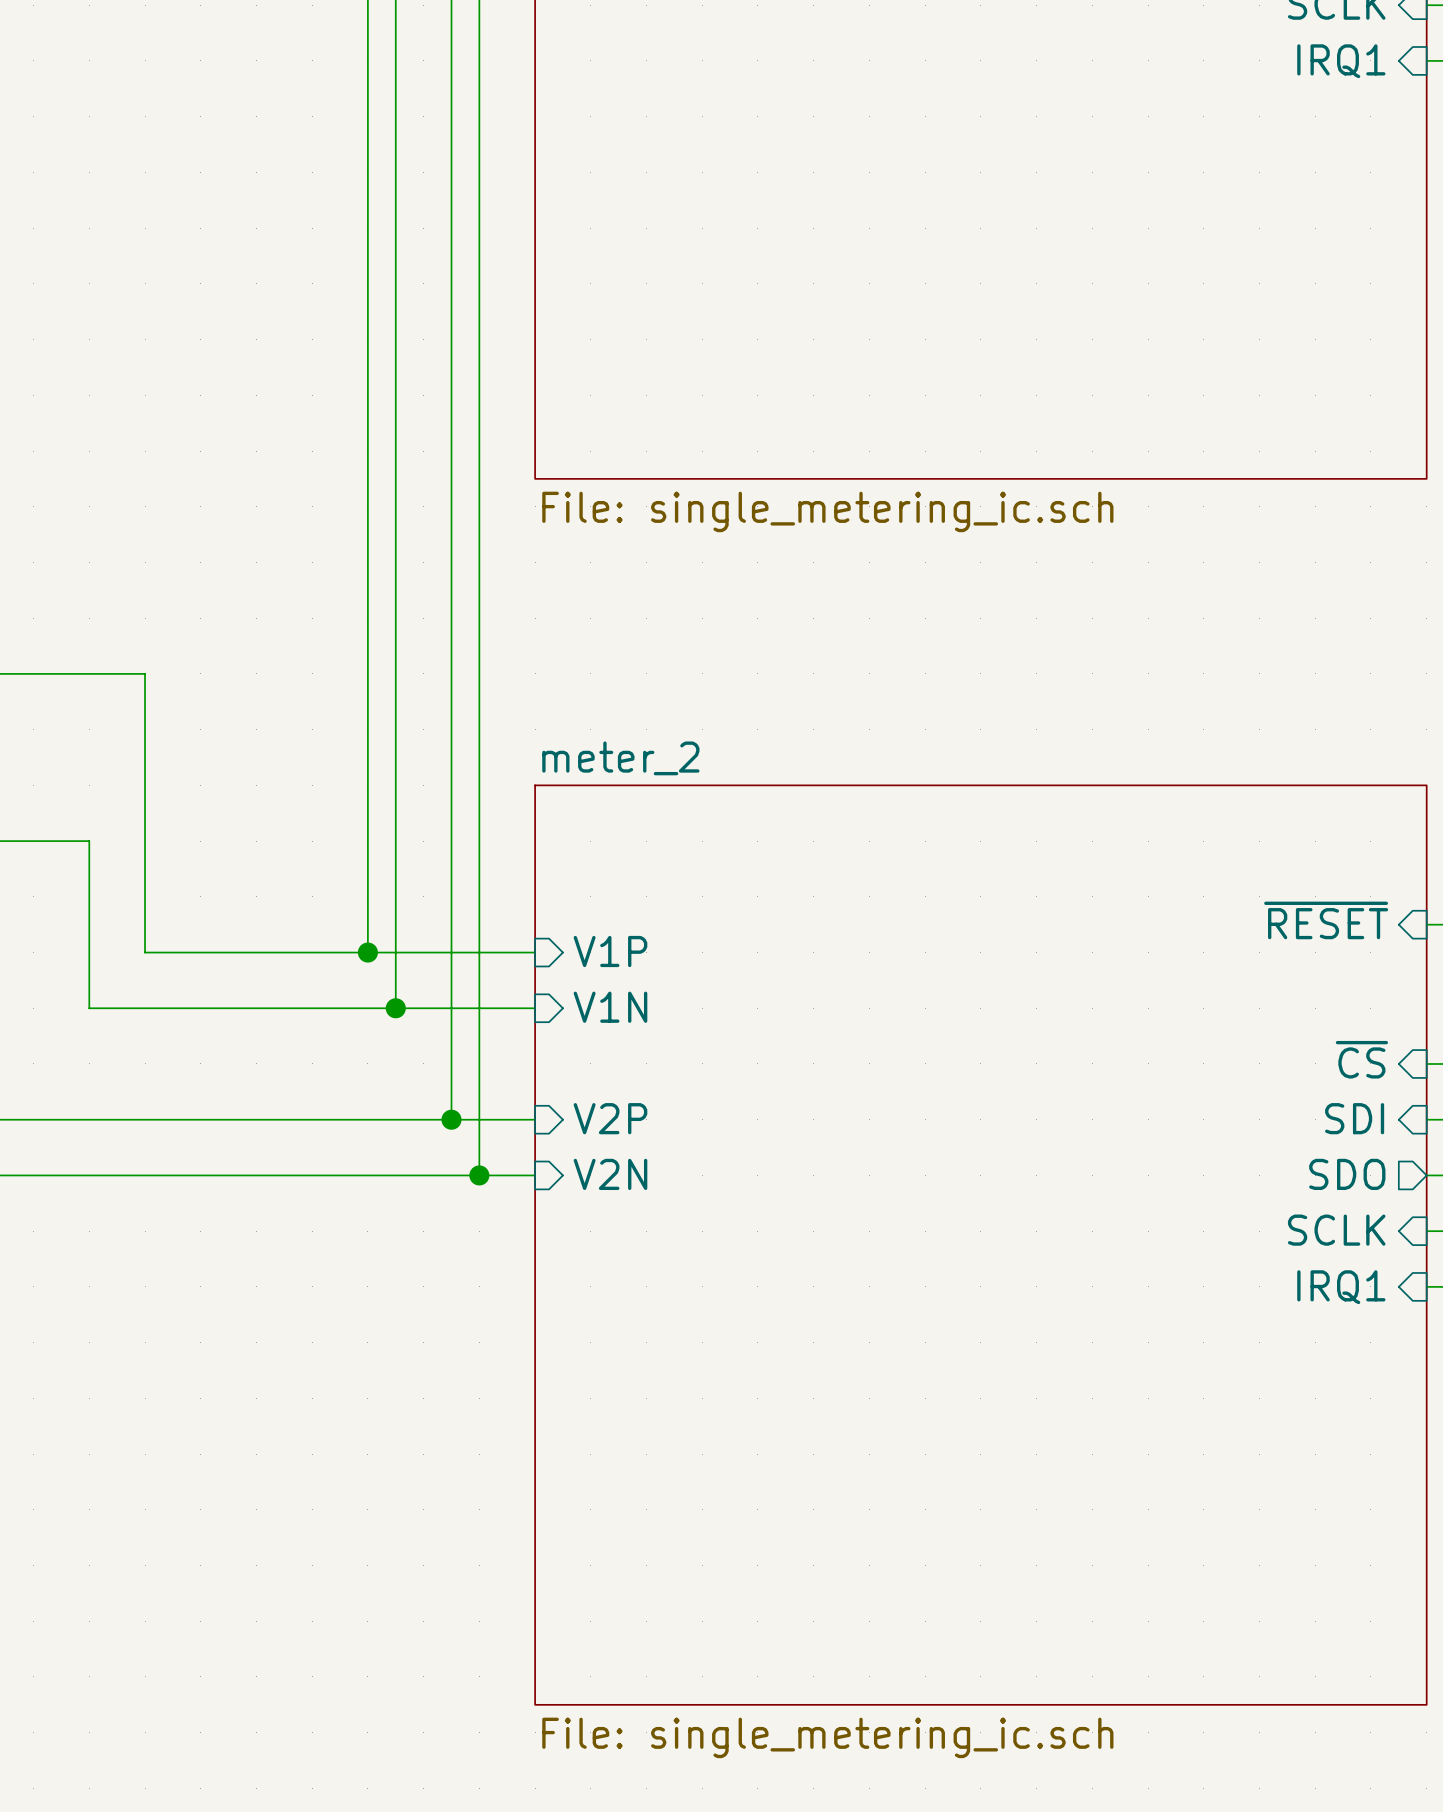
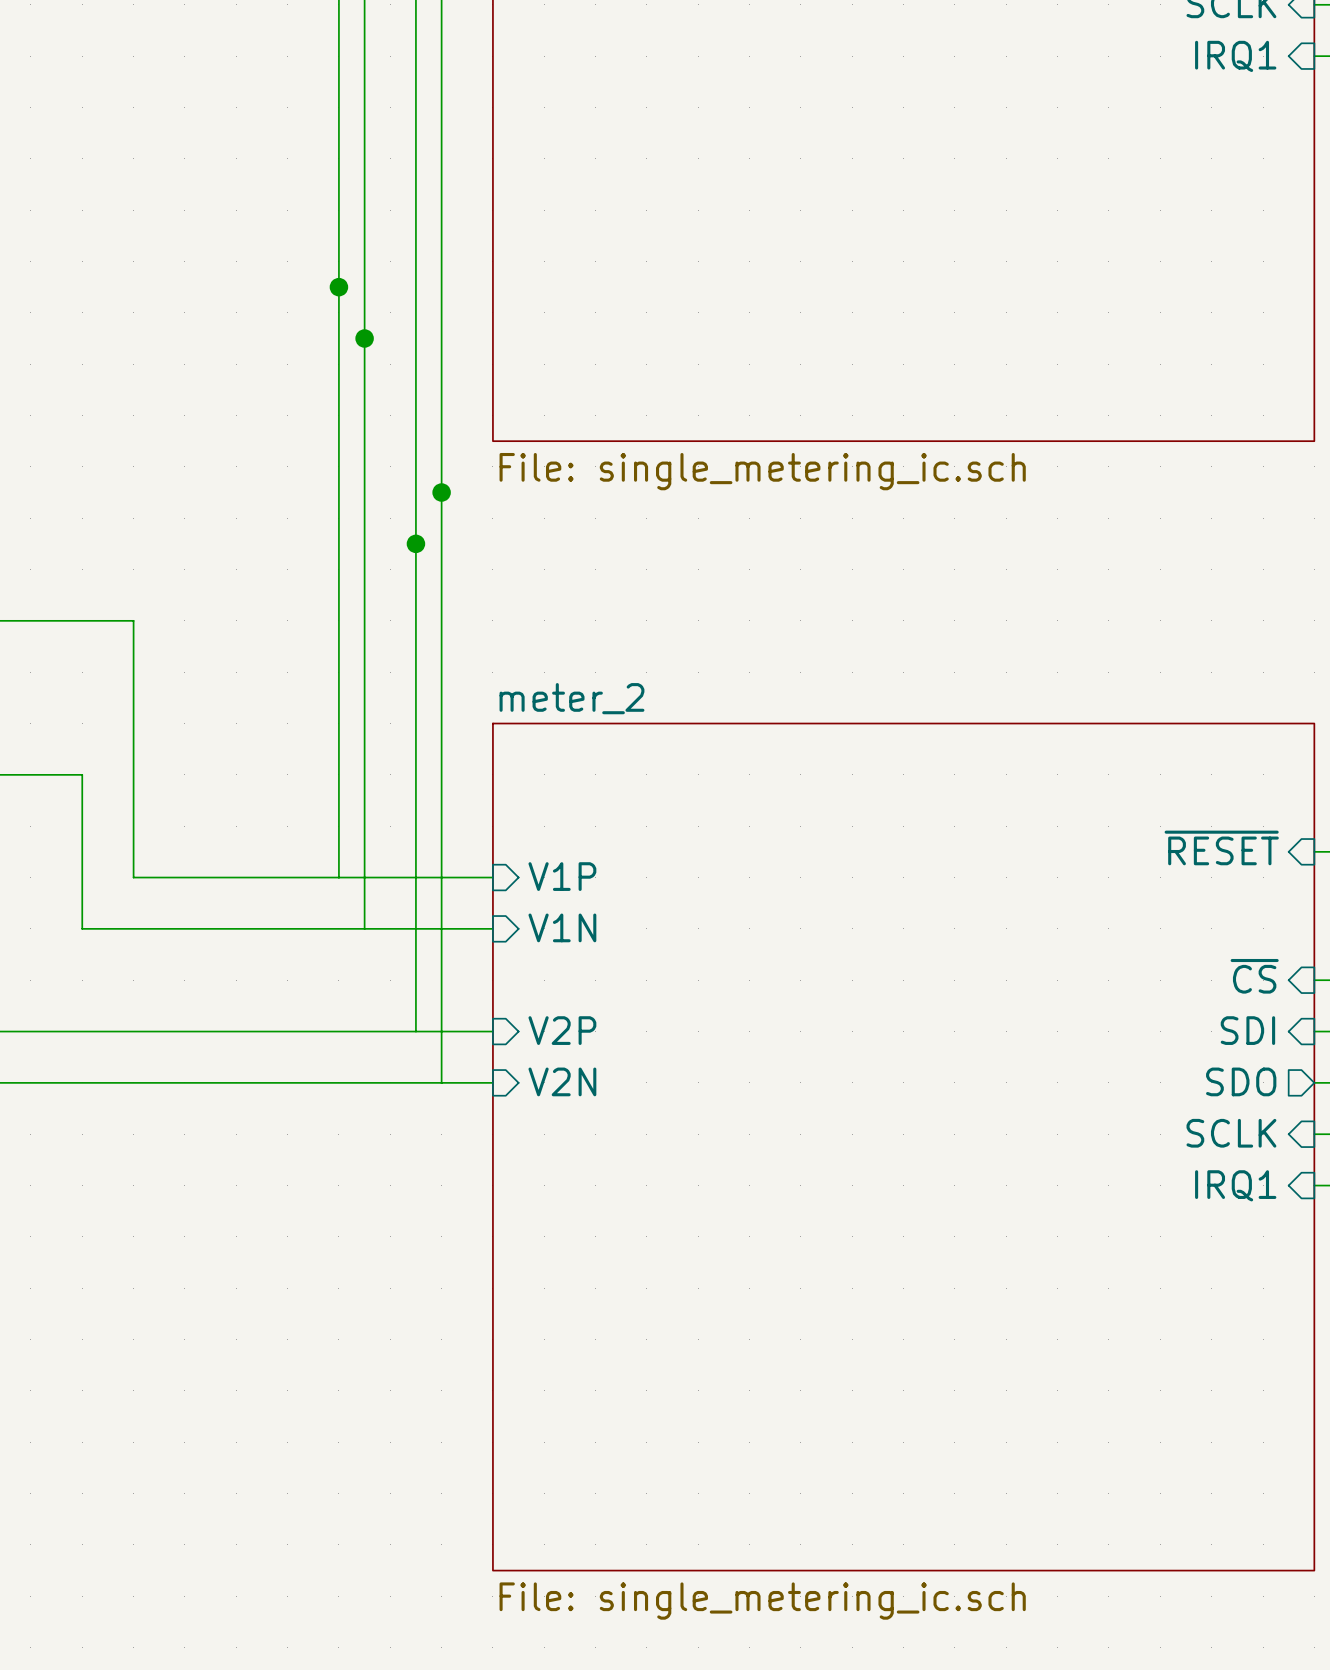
junction: none -> (338, 287)
junction: none -> (364, 338)
junction: none -> (441, 492)
junction: none -> (415, 543)
junction: (367, 952) -> none
junction: (395, 1008) -> none
junction: (451, 1119) -> none
junction: (479, 1175) -> none

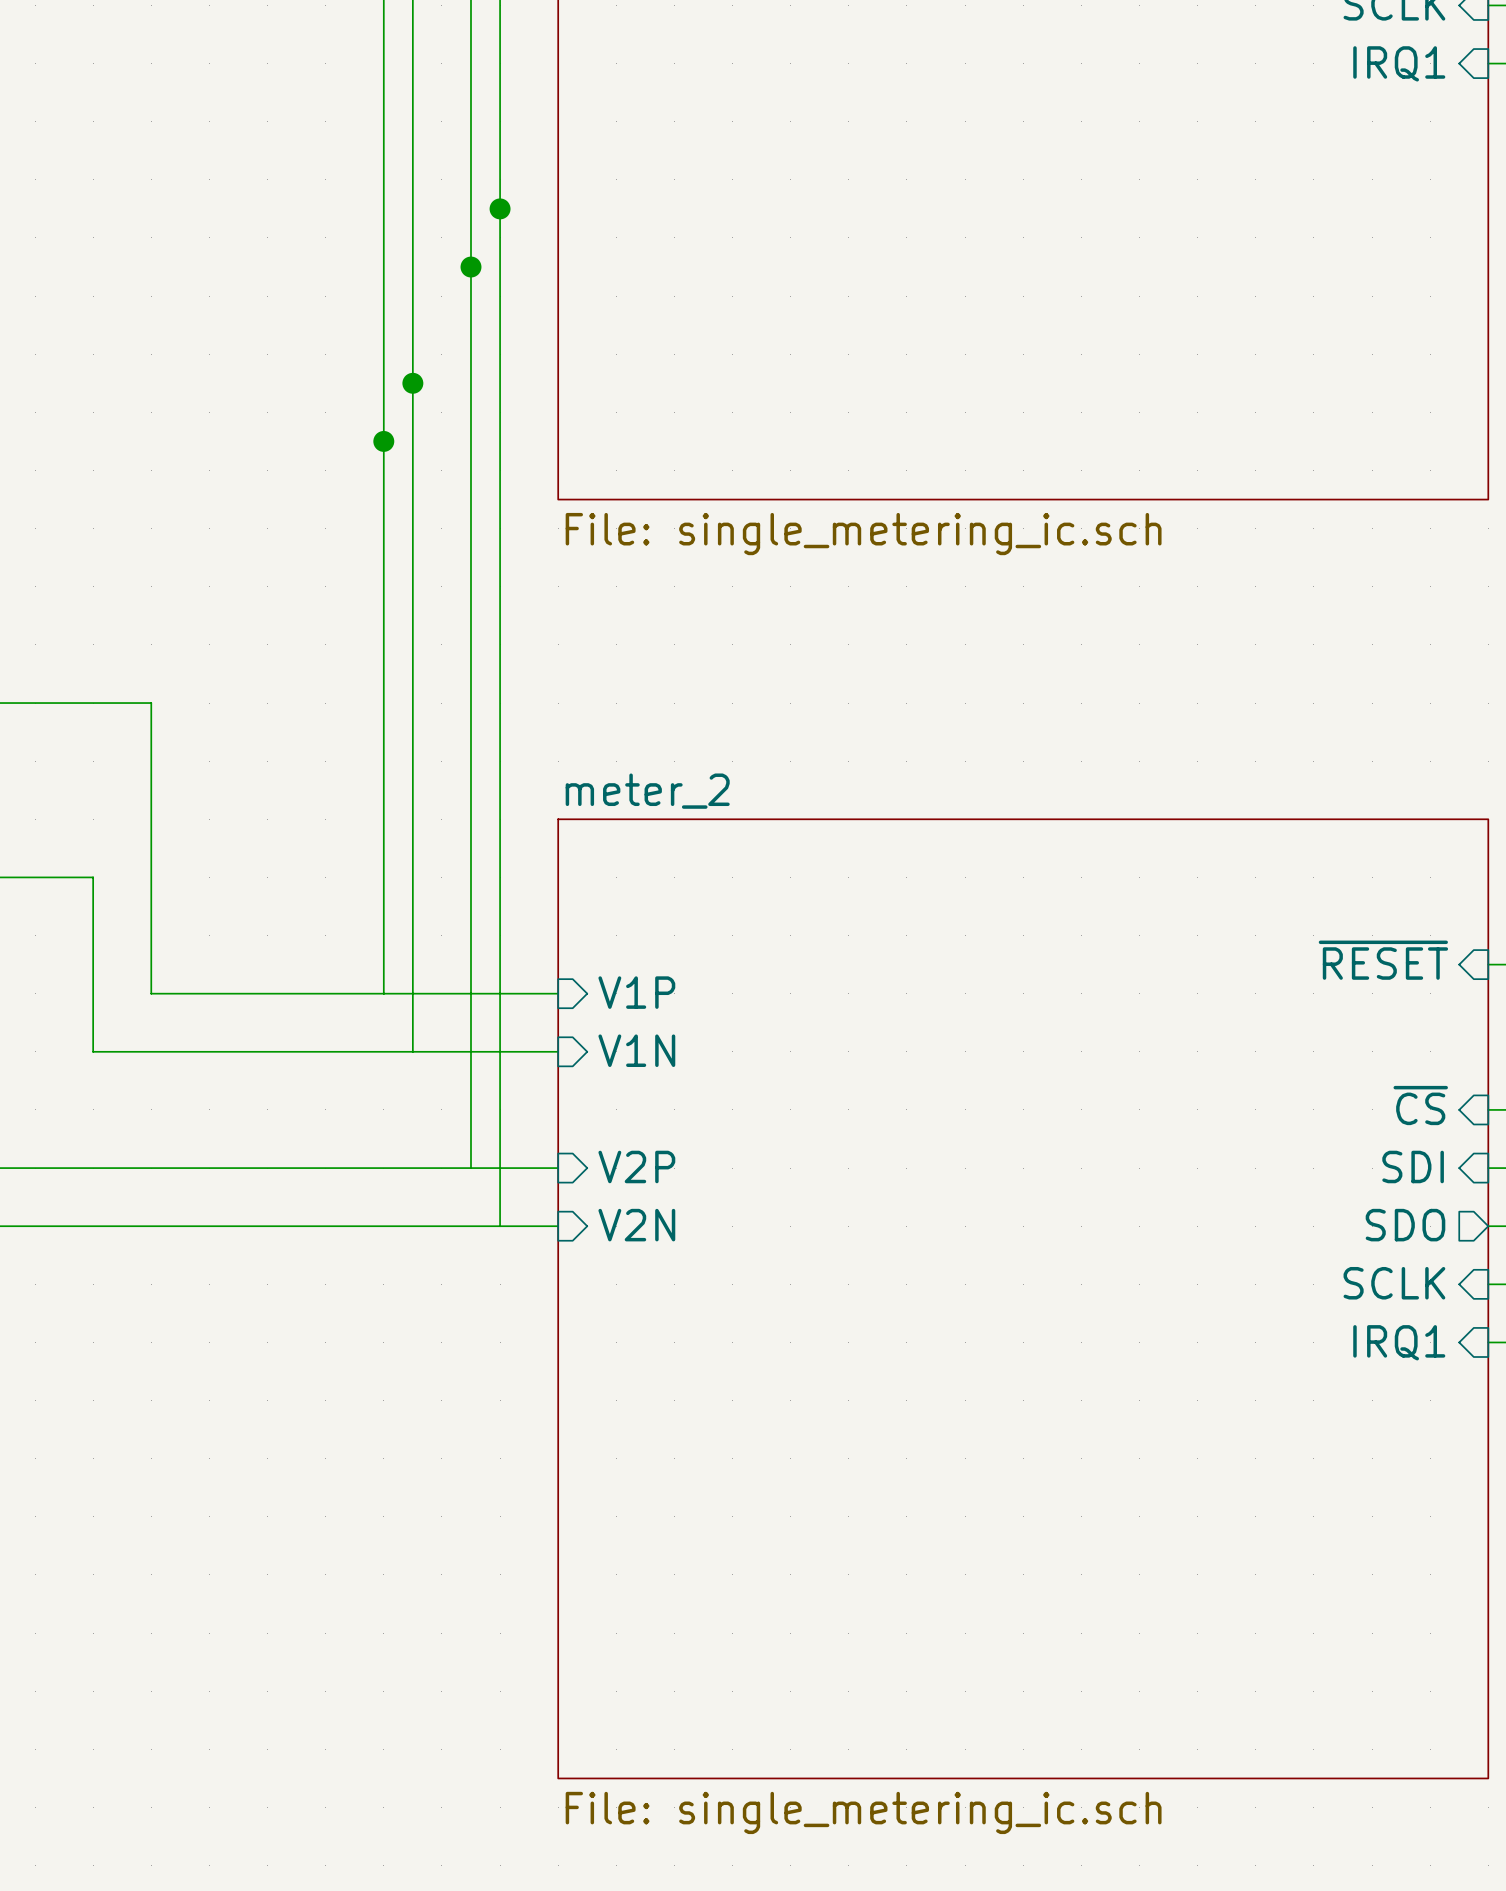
junction: none -> (500, 208)
junction: none -> (470, 267)
junction: (338, 287) -> none
junction: none -> (383, 441)
junction: (441, 492) -> none
junction: (415, 543) -> none

